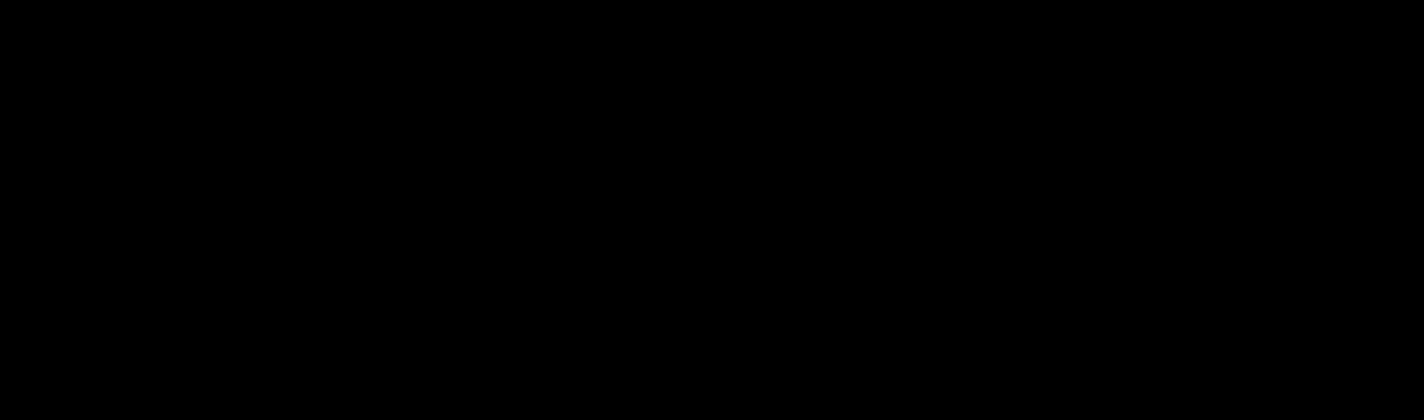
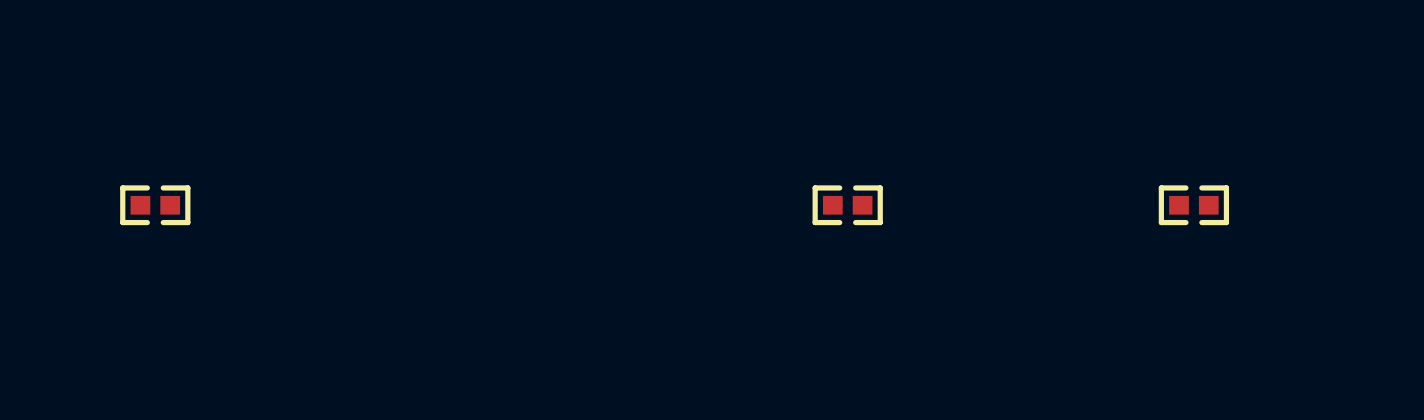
part: none -> (155, 205)
part: none -> (847, 205)
part: none -> (1193, 205)

